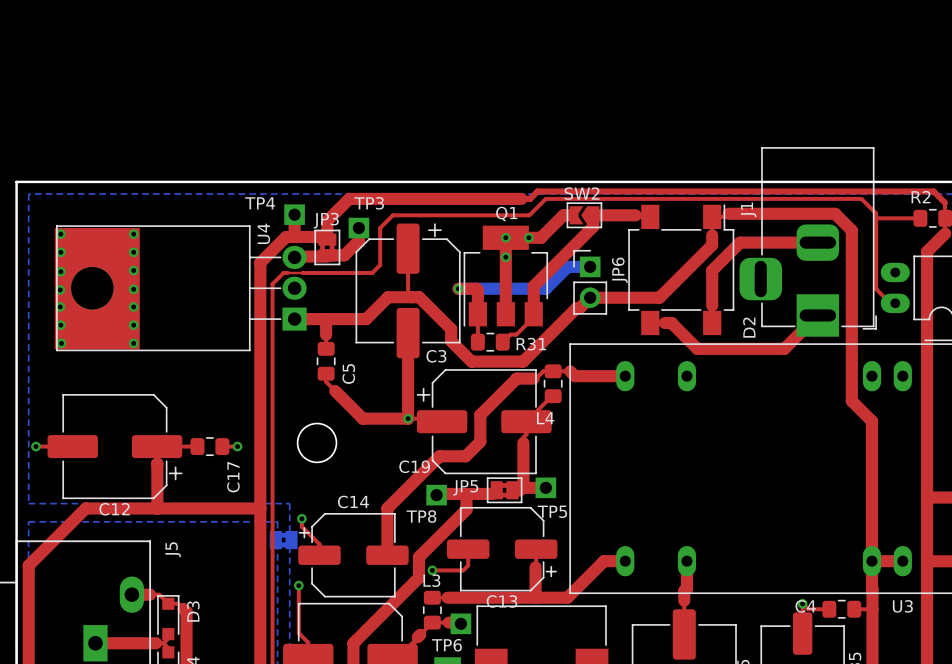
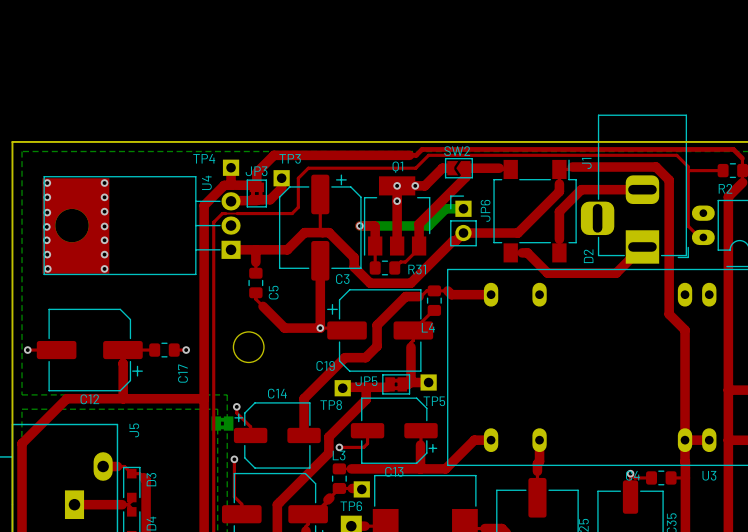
R2 name position: R2 (921, 197) -> R2 (725, 188)

